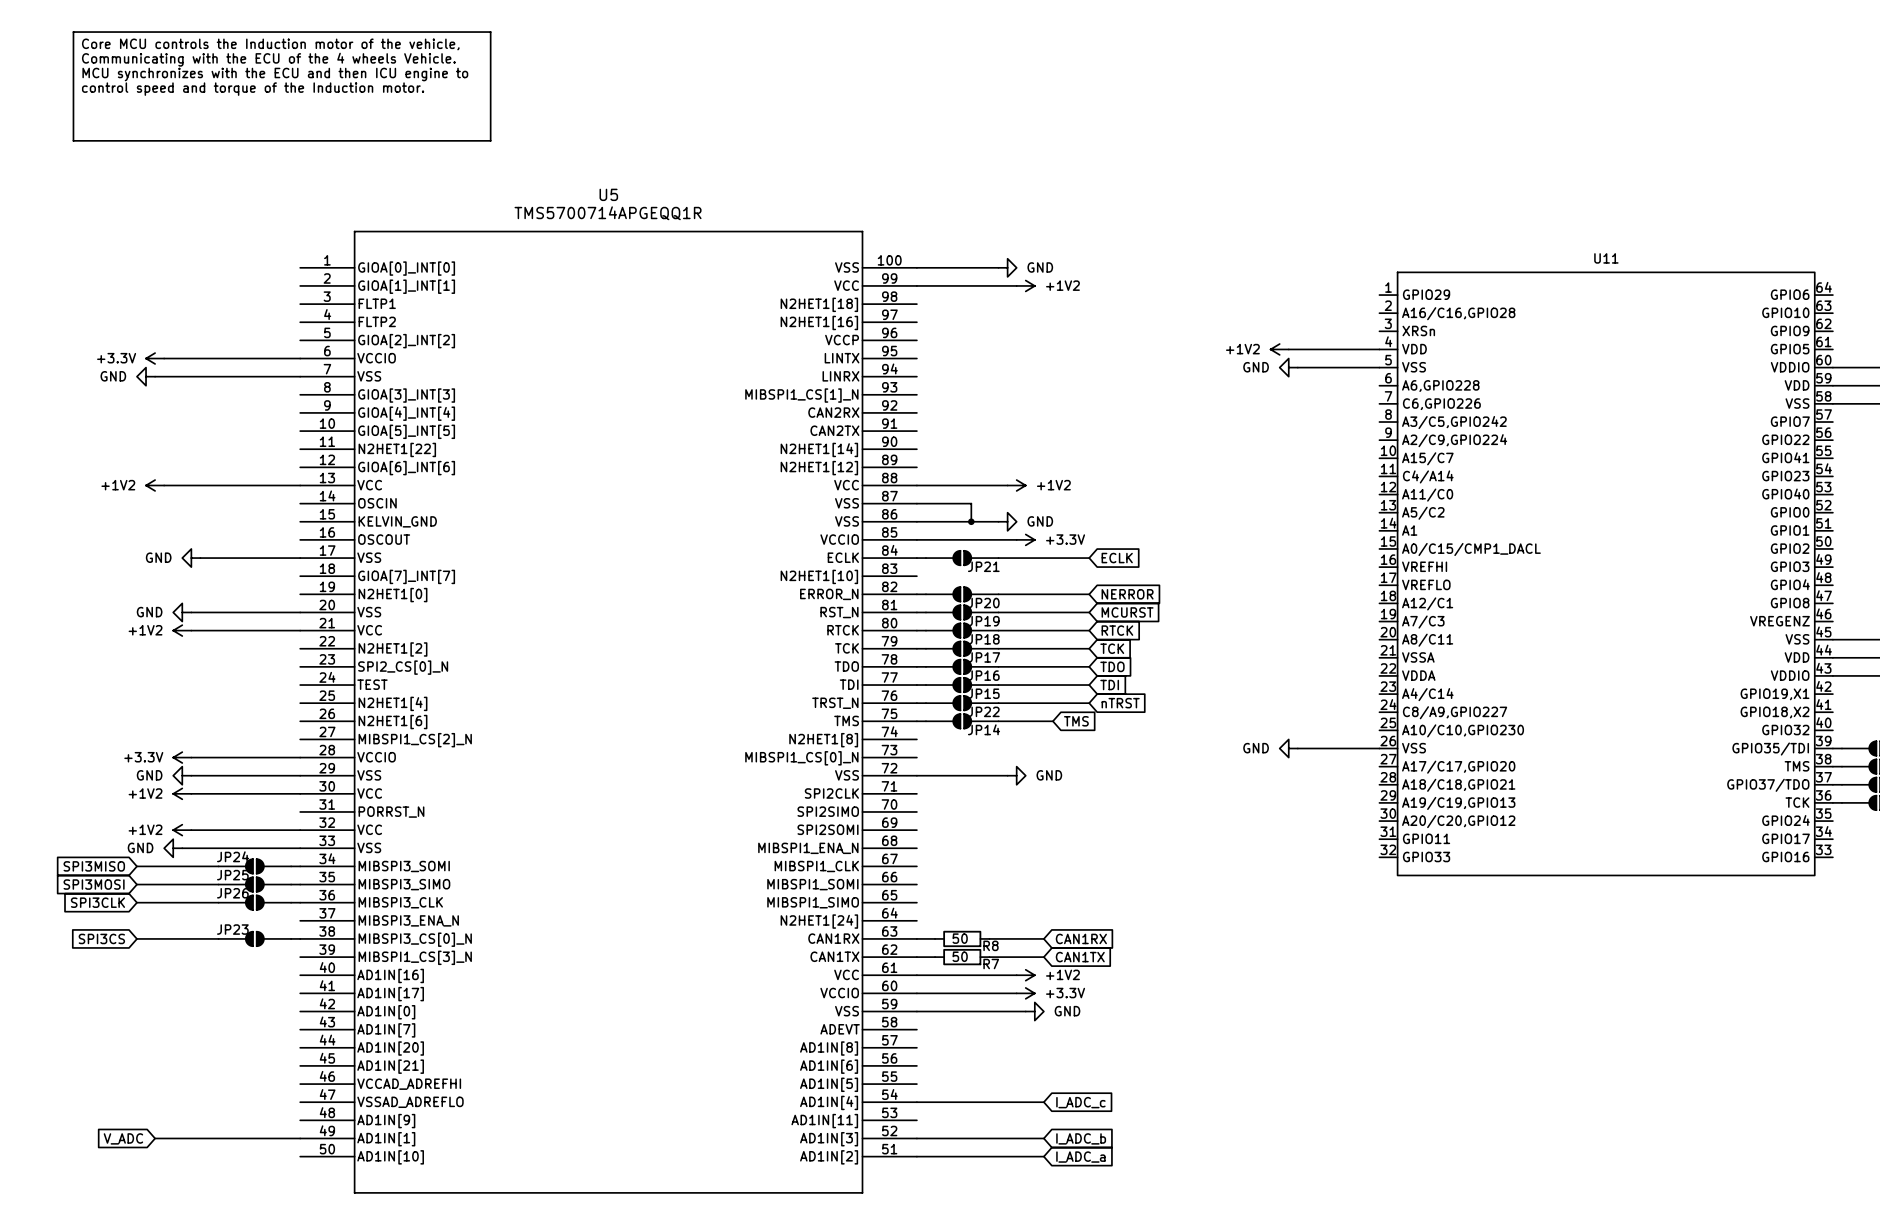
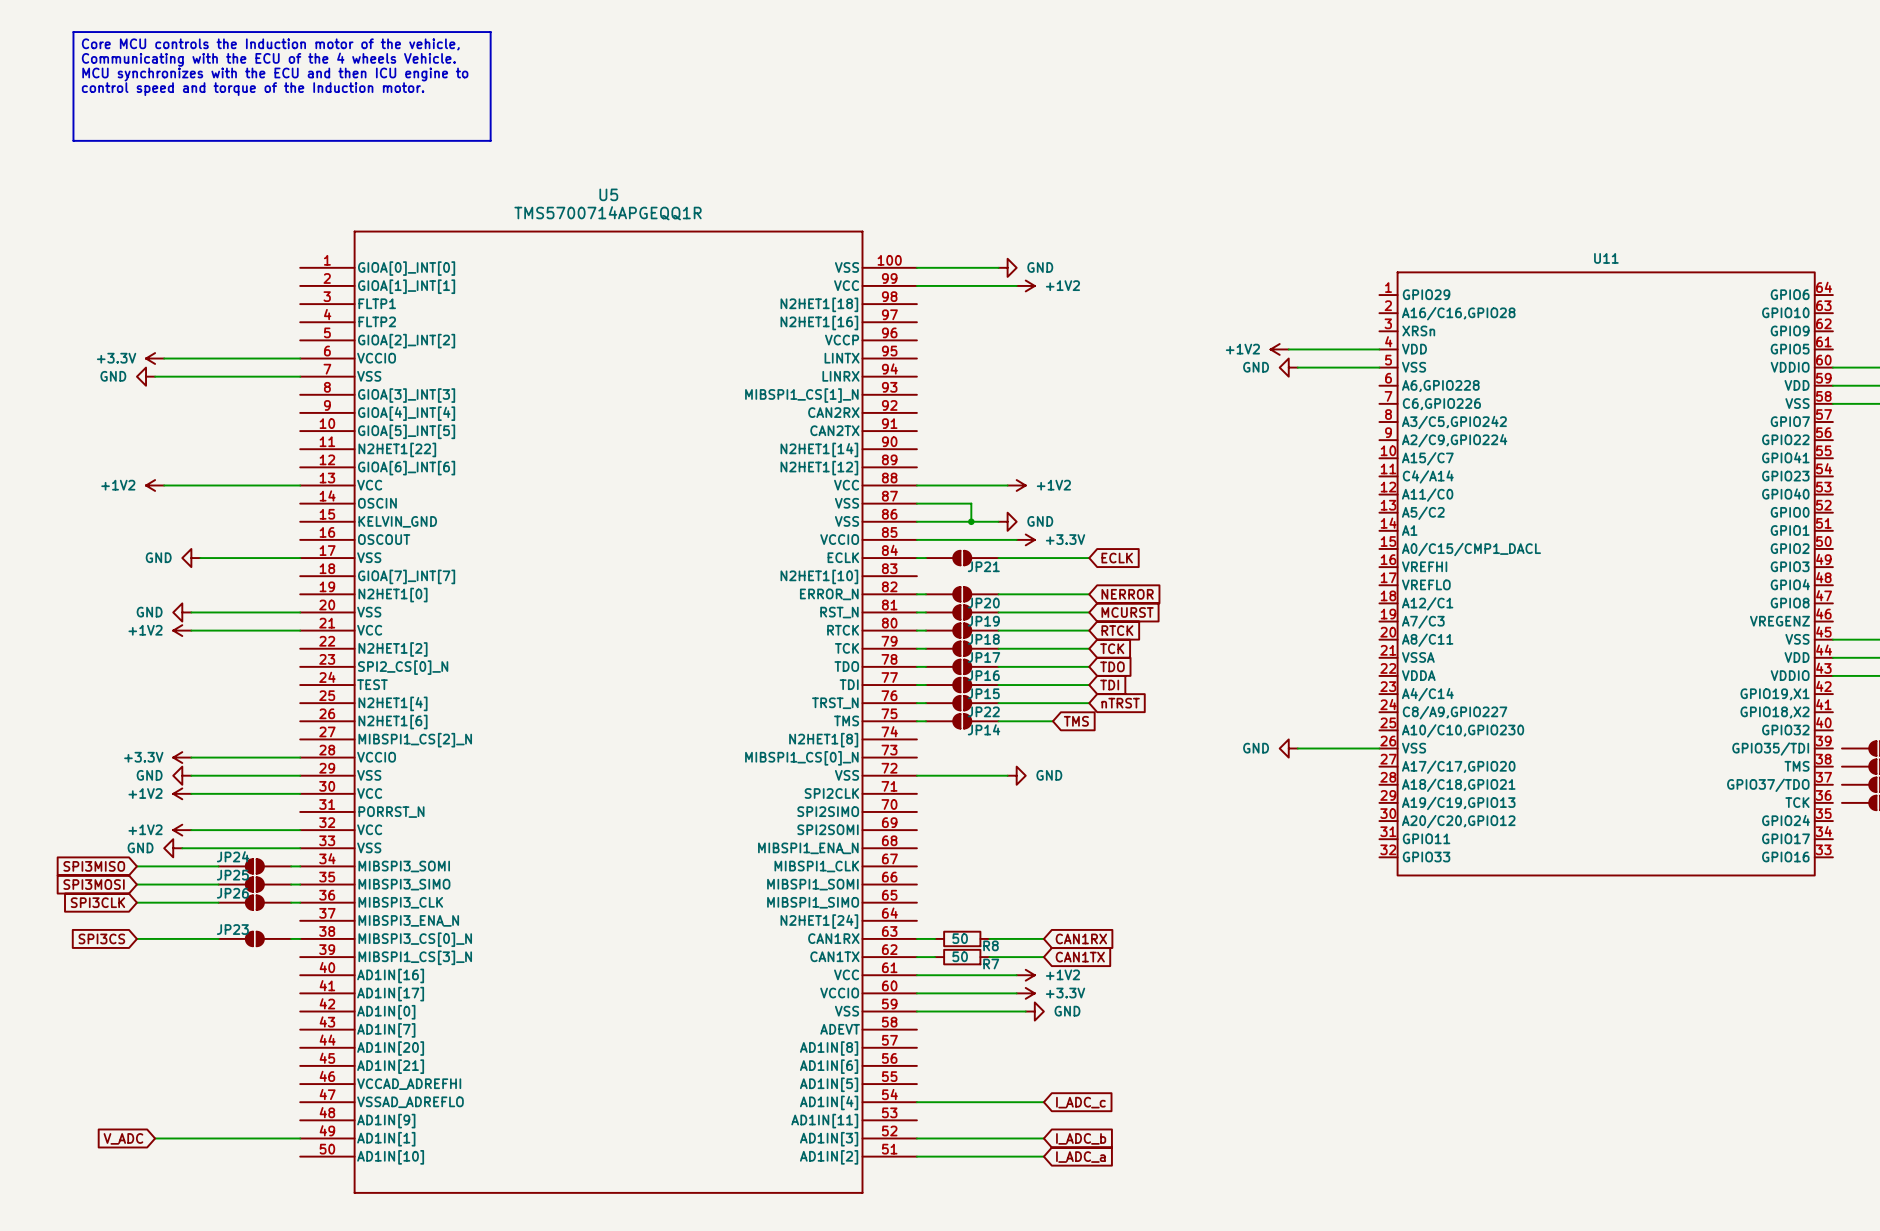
wire: (1832, 748) (1841, 748) -> none
wire: (1832, 766) (1841, 766) -> none
wire: (1832, 784) (1841, 784) -> none
wire: (1832, 802) (1841, 802) -> none

